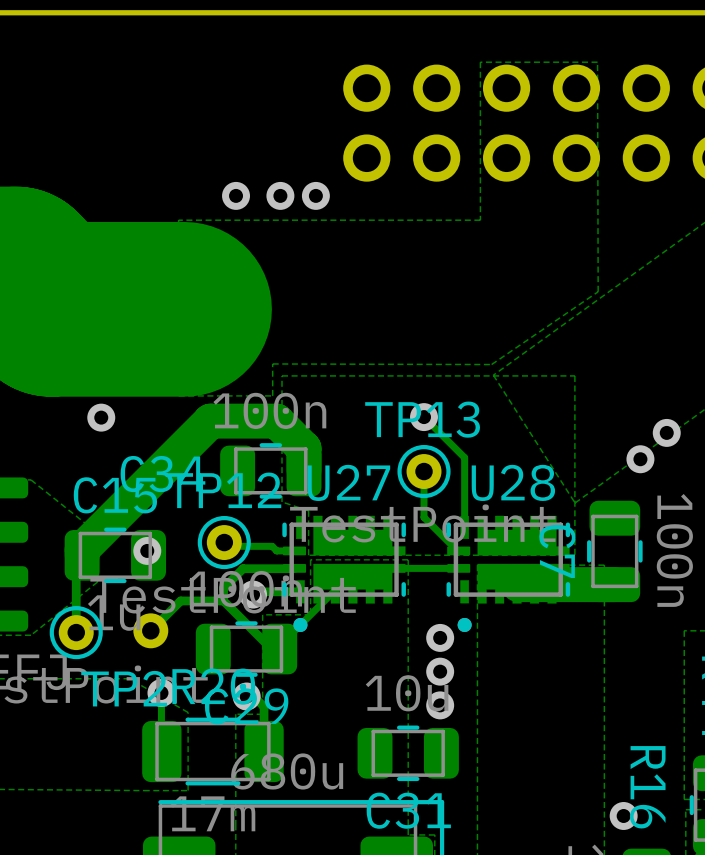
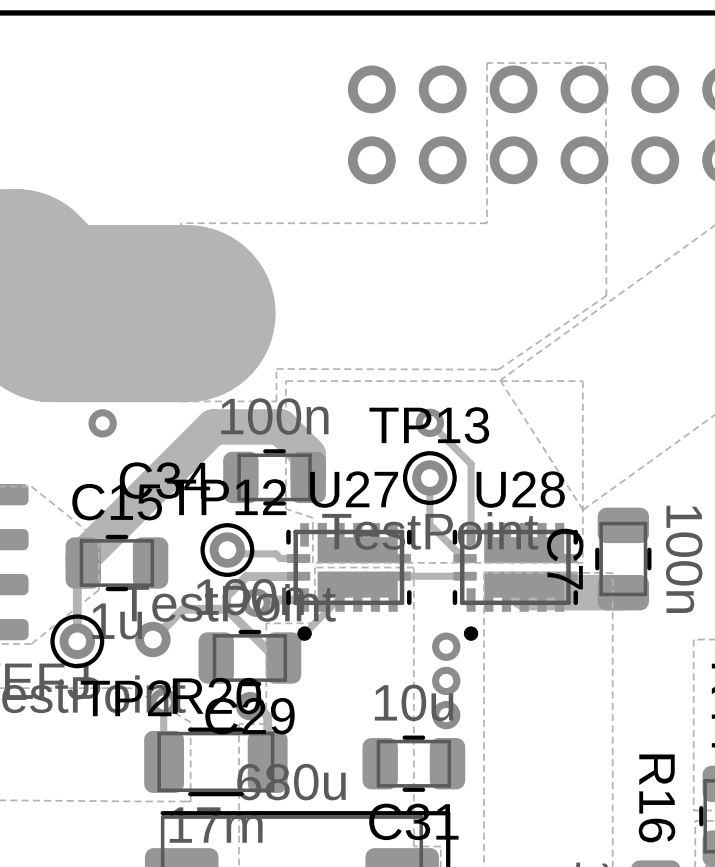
via: (236, 195) -> none
via: (280, 195) -> none
via: (315, 195) -> none
via: (666, 432) -> none
via: (640, 459) -> none
via: (147, 550) -> none
via: (623, 815) -> none

